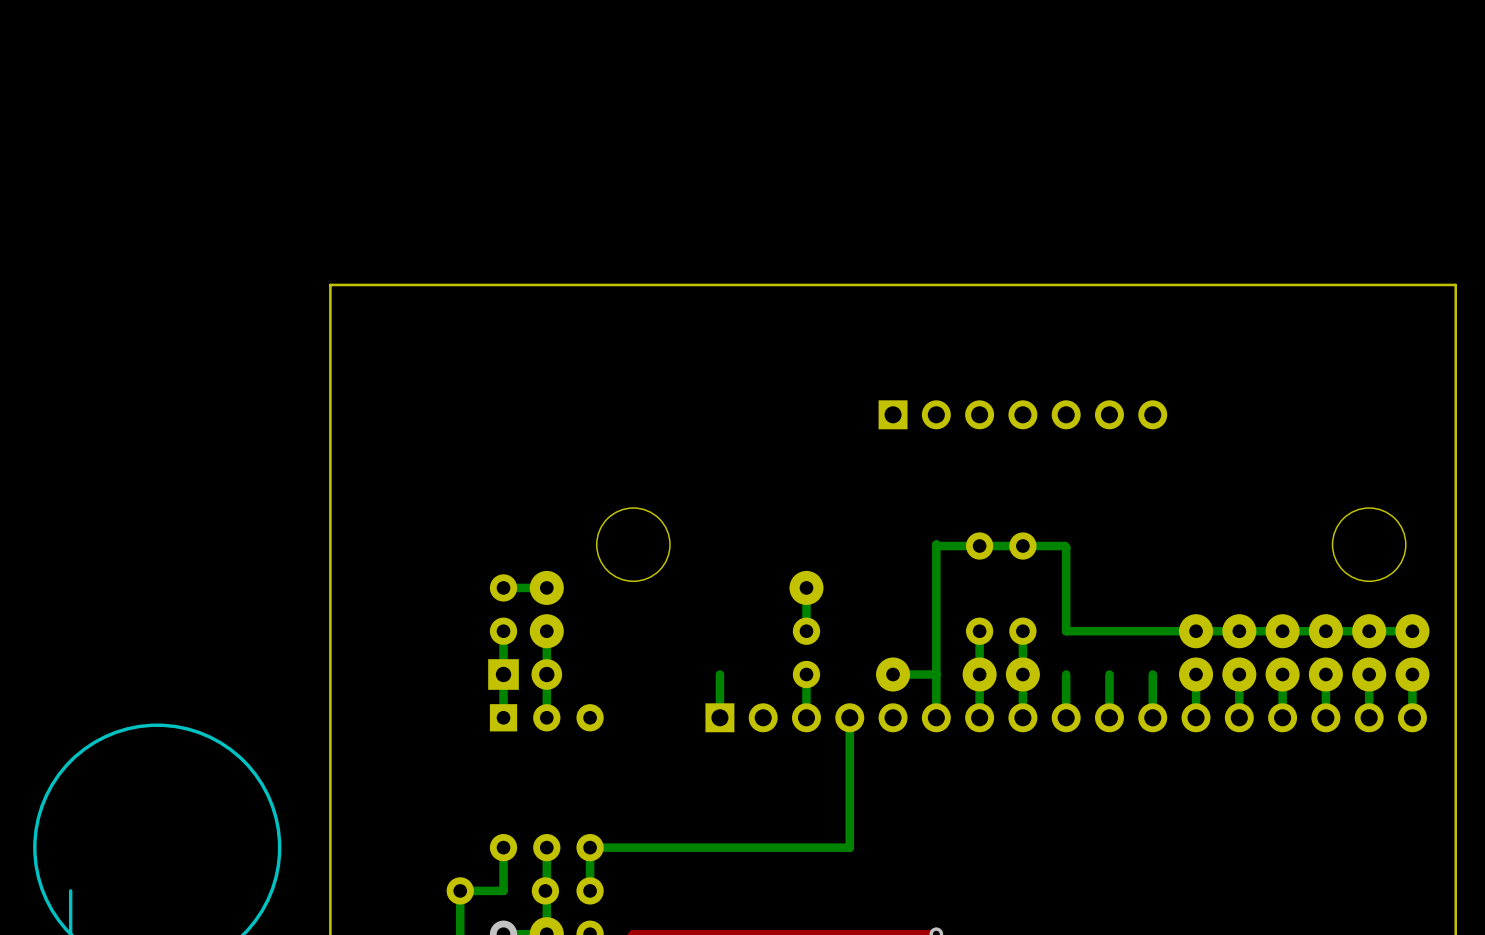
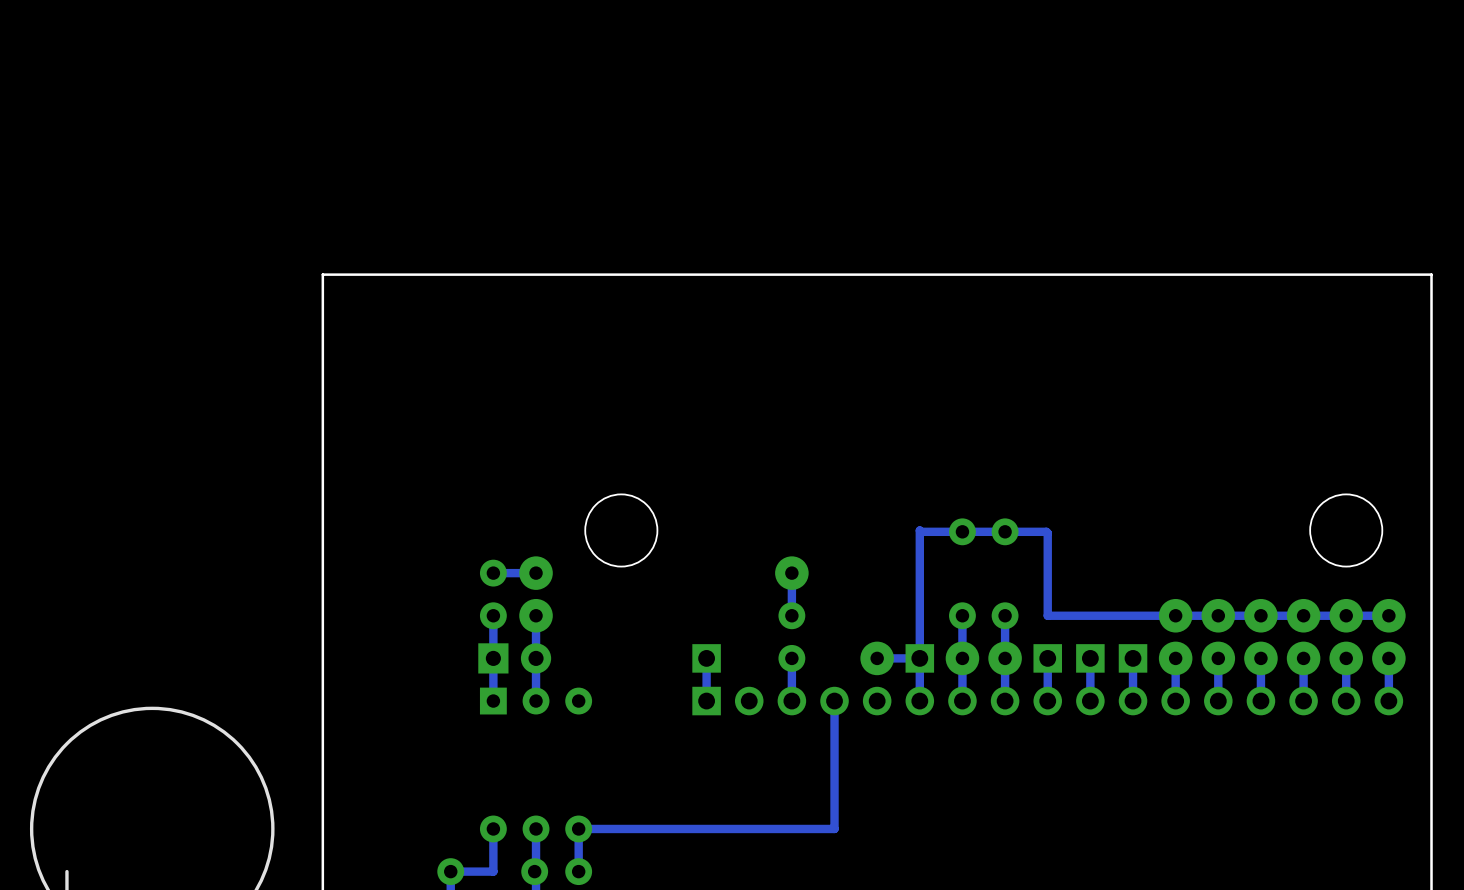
part: (1022, 414) -> none
part: none -> (706, 658)
part: none -> (919, 658)
part: none -> (1047, 658)
part: none -> (1090, 658)
part: none -> (1133, 658)

